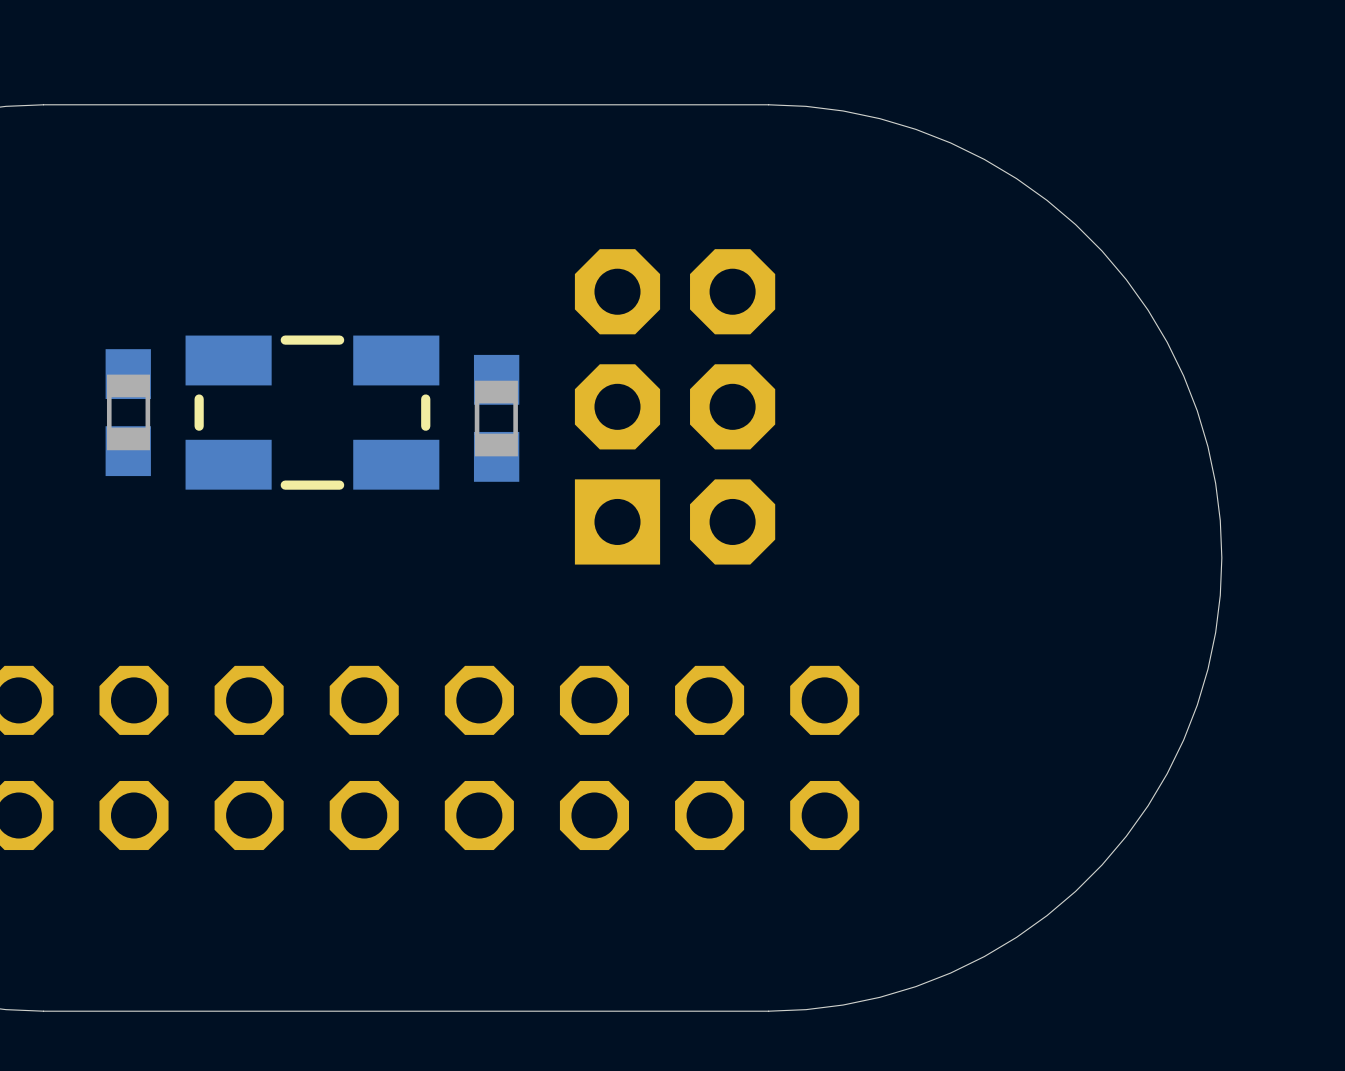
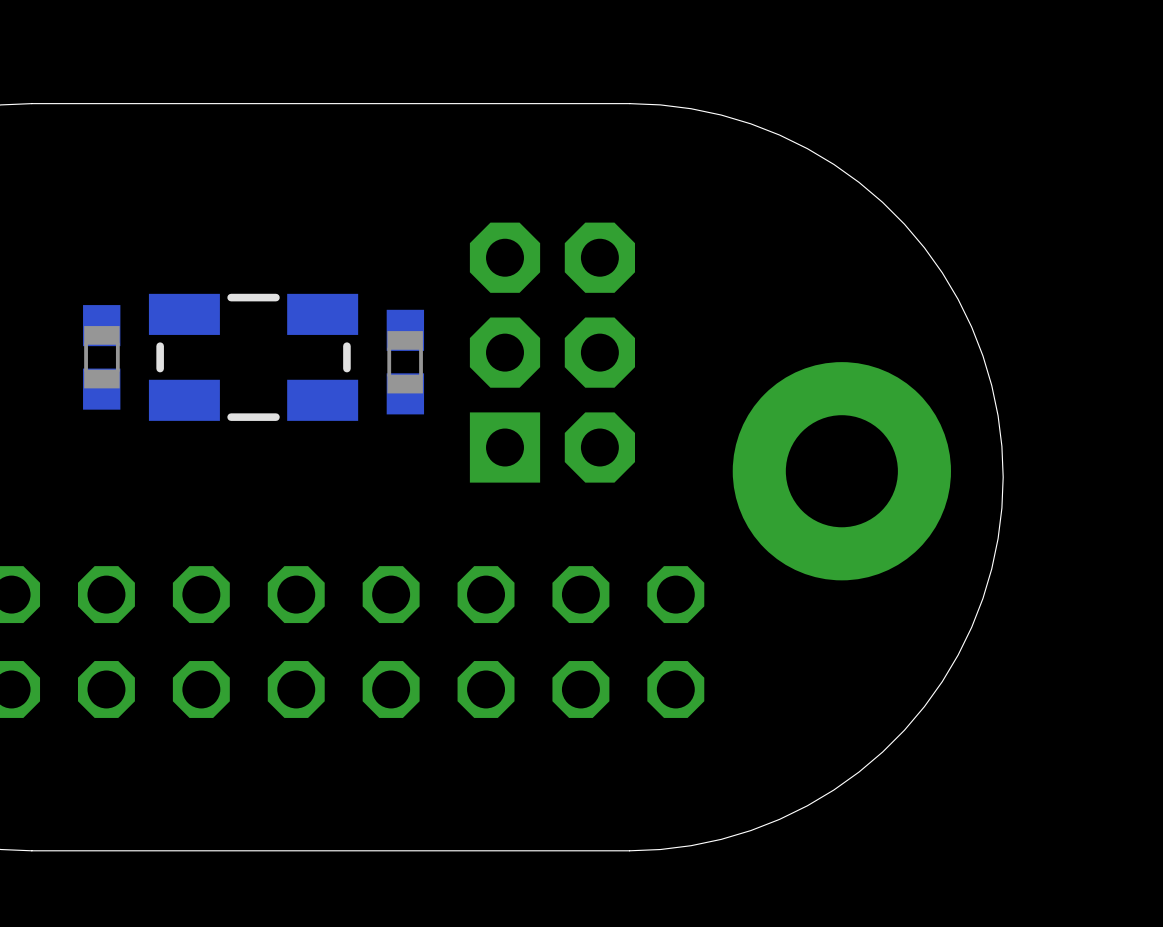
part: none -> (841, 471)

